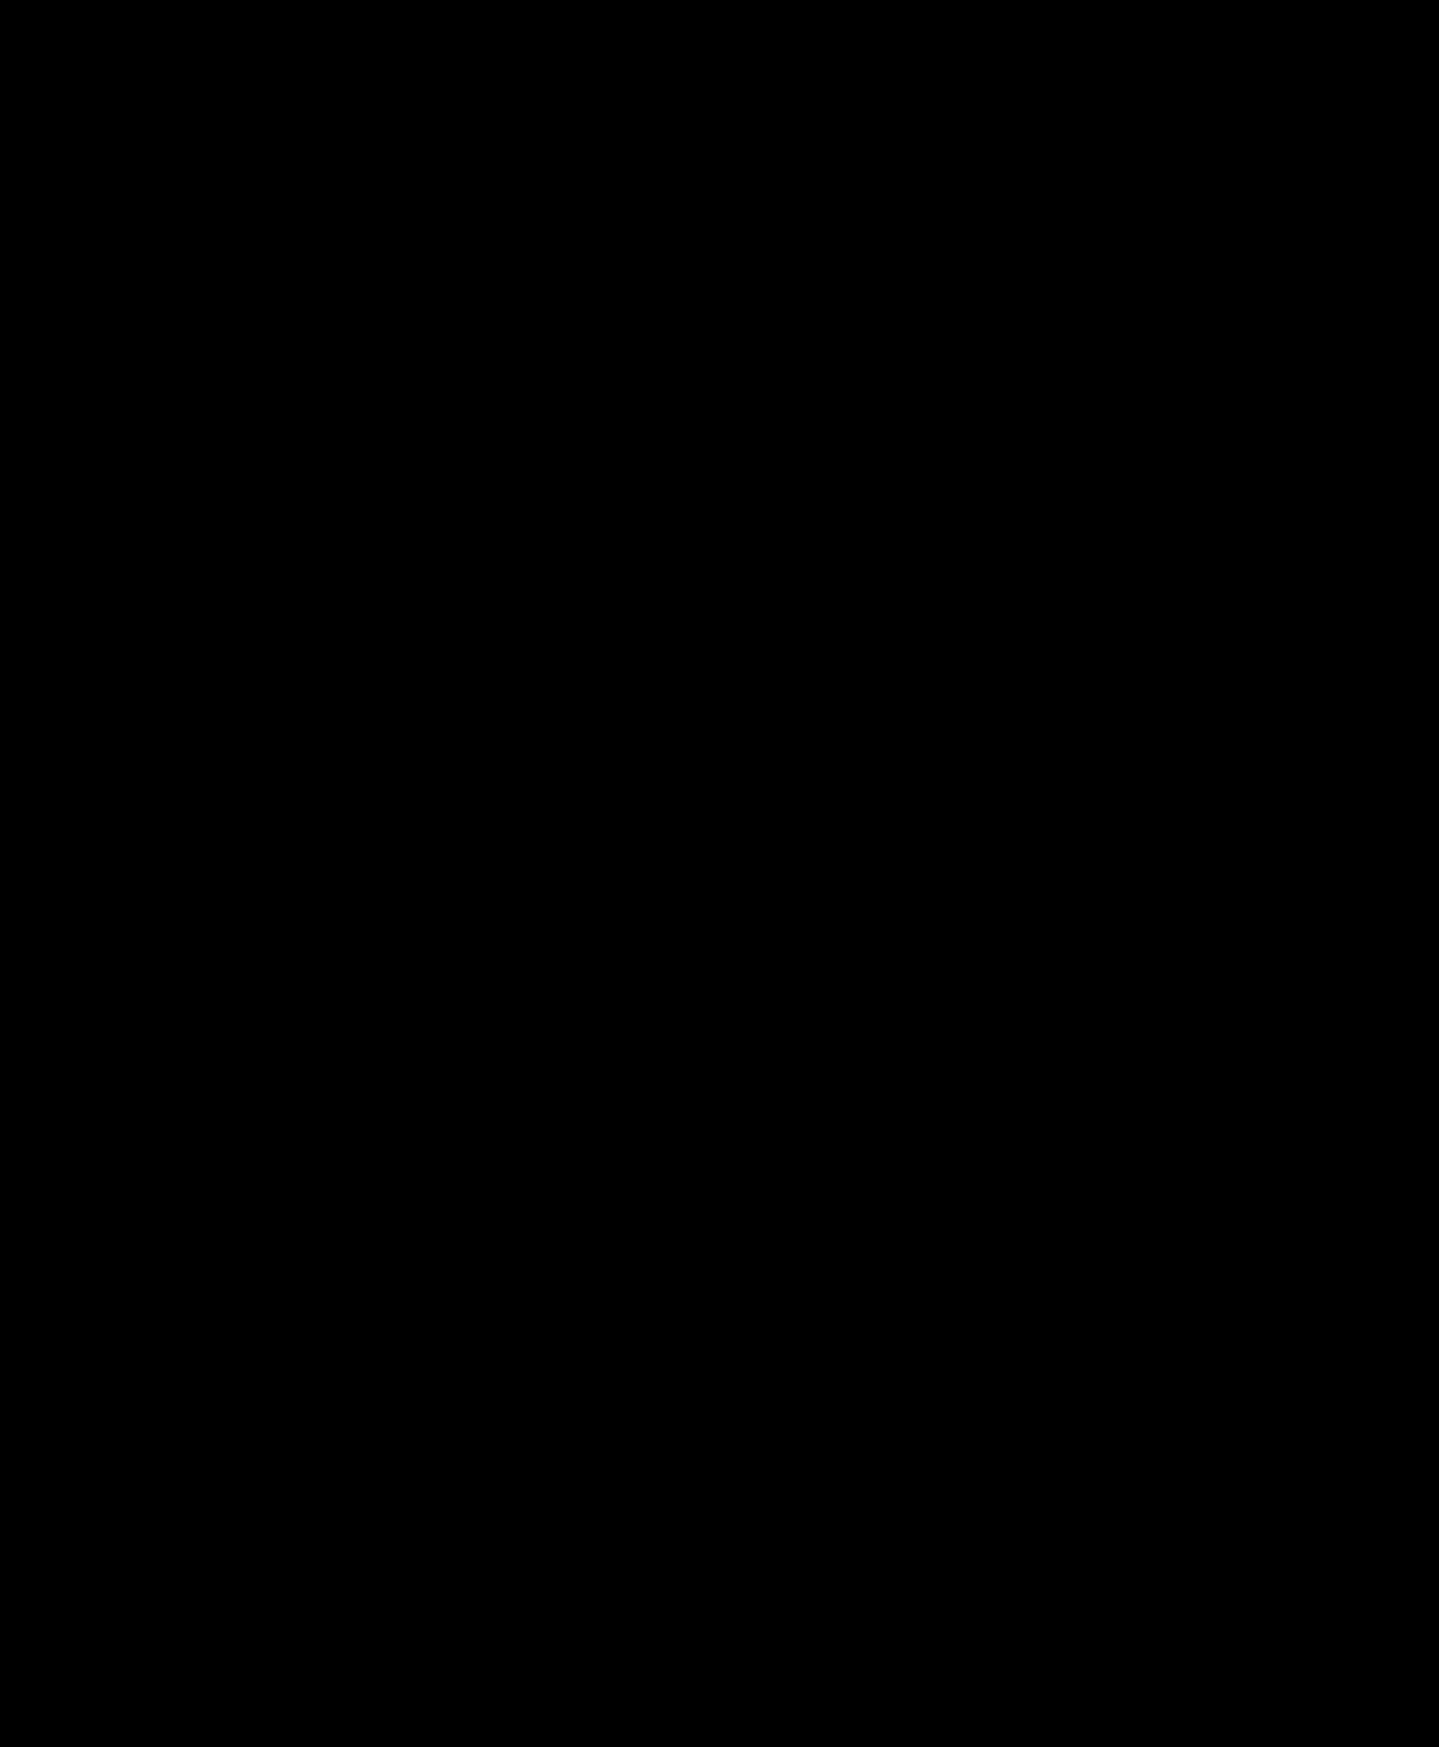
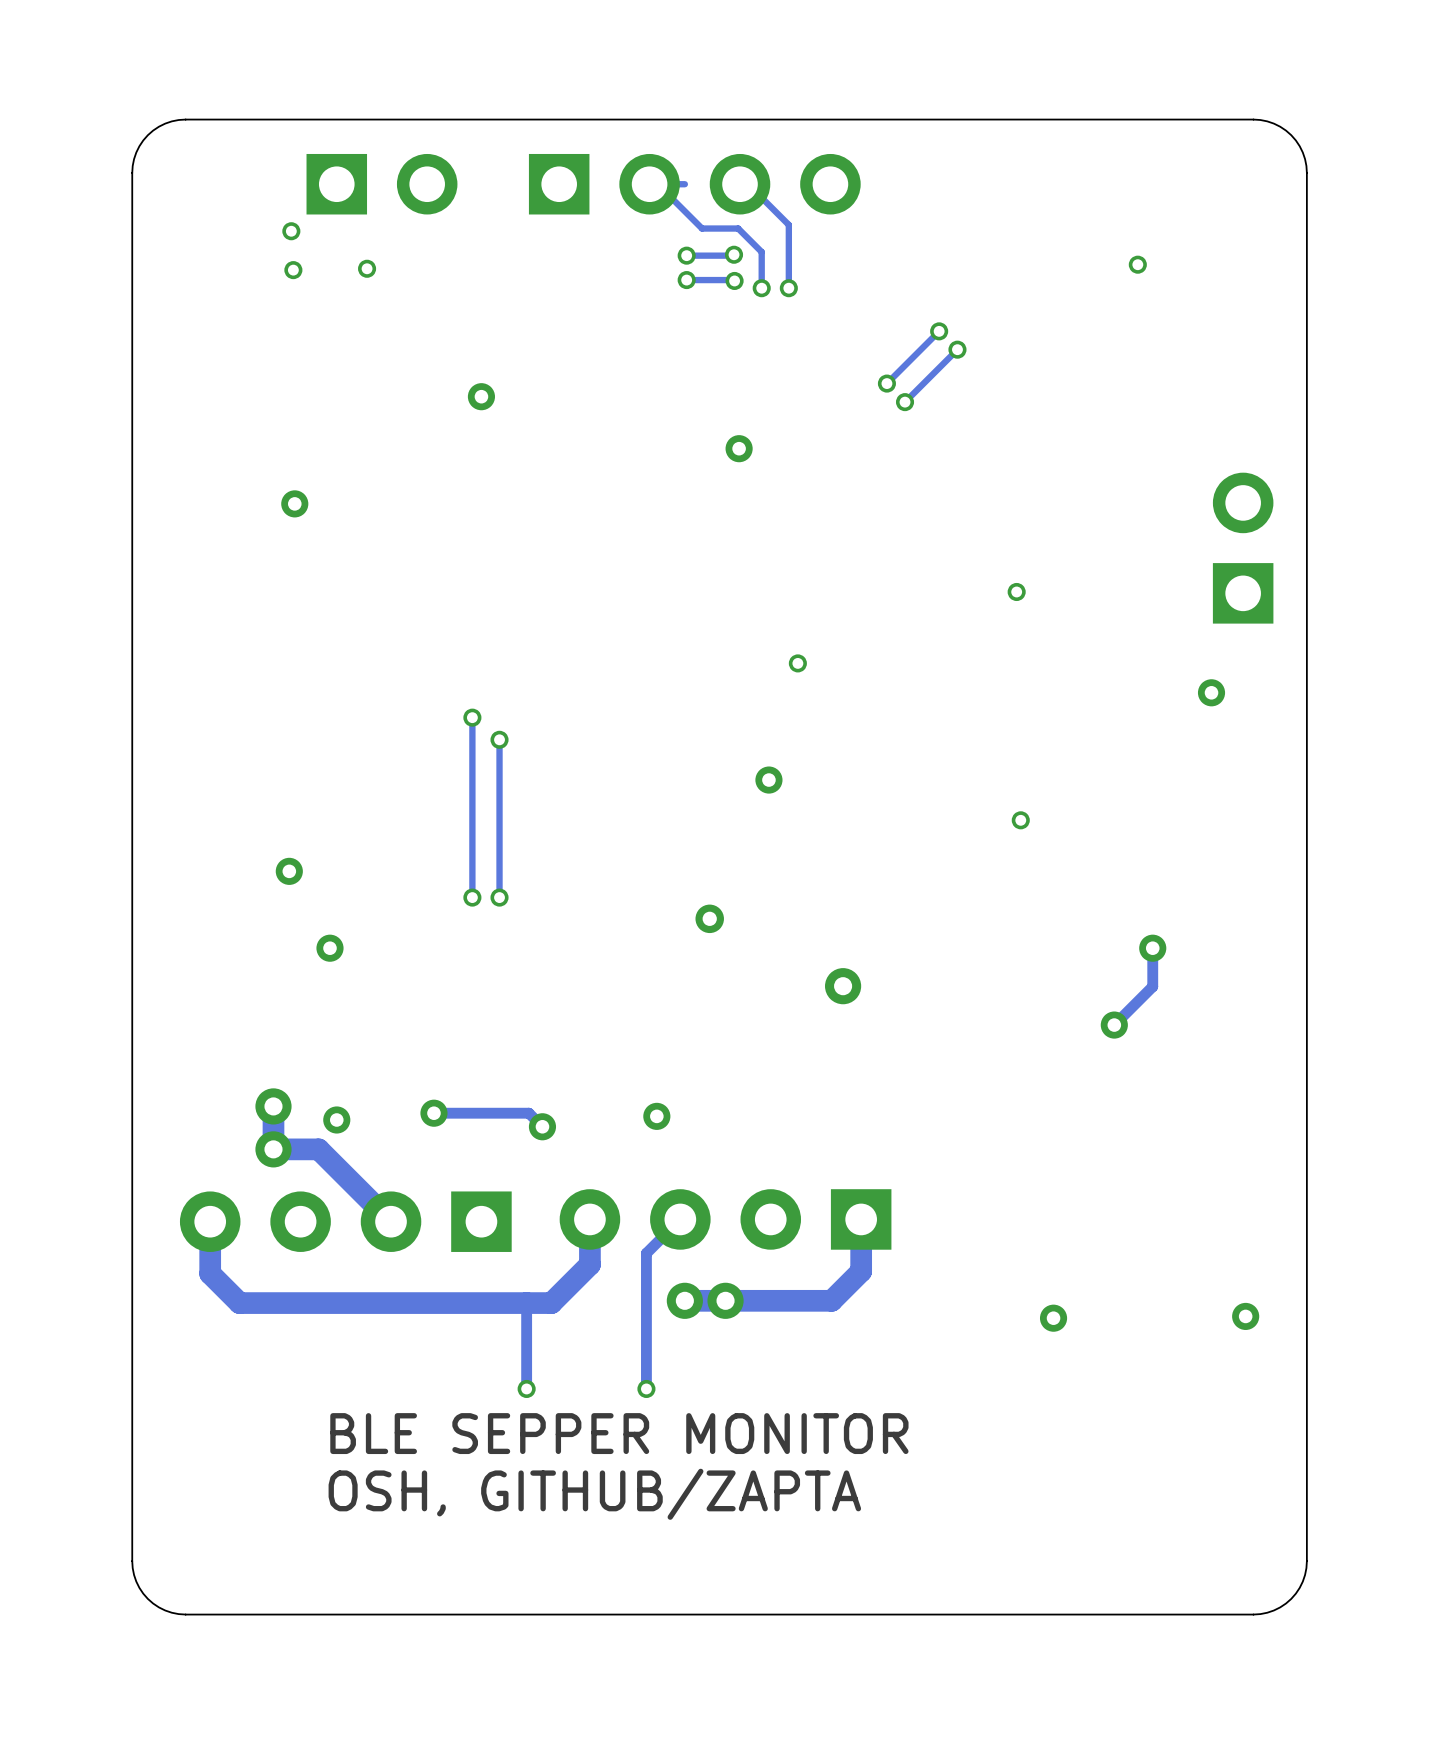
board edge: none -> (1253, 119) (185, 119) (165, 123) (153, 130) (143, 140) (134, 159) (132, 172) (132, 1561) (136, 1581) (143, 1593) (153, 1603) (165, 1610) (185, 1614) (1253, 1614) (1273, 1610) (1286, 1603) (1295, 1593) (1302, 1581) (1306, 1561) (1306, 172) (1302, 152) (1291, 135) (1273, 123) (1253, 119)
part: none -> (381, 184)
track: none -> (684, 184) (657, 184) (702, 228) (738, 228) (761, 252) (761, 288)
part: none -> (694, 184)
track: none -> (748, 184) (788, 224) (788, 288)
via: none -> (291, 231)
track: none -> (734, 254) (686, 255)
via: none -> (734, 254)
via: none -> (686, 255)
via: none -> (1137, 264)
via: none -> (367, 268)
via: none -> (293, 270)
track: none -> (686, 280) (734, 280)
via: none -> (686, 280)
via: none -> (734, 280)
via: none -> (761, 288)
via: none -> (788, 288)
track: none -> (939, 331) (886, 383)
via: none -> (939, 331)
track: none -> (957, 349) (905, 402)
via: none -> (957, 349)
via: none -> (886, 383)
via: none -> (481, 396)
via: none -> (905, 402)
via: none -> (739, 448)
via: none -> (294, 503)
part: none -> (1243, 548)
via: none -> (1016, 591)
via: none -> (797, 663)
via: none -> (1211, 692)
track: none -> (472, 717) (472, 897)
via: none -> (472, 717)
track: none -> (499, 739) (499, 897)
via: none -> (499, 739)
via: none -> (768, 780)
via: none -> (1020, 820)
via: none -> (289, 871)
via: none -> (472, 897)
via: none -> (499, 897)
via: none -> (709, 918)
via: none -> (329, 948)
track: none -> (1152, 948) (1152, 986) (1114, 1025)
via: none -> (1152, 948)
via: none -> (843, 986)
via: none -> (1114, 1025)
track: none -> (273, 1106) (273, 1149) (318, 1149) (391, 1221)
via: none -> (273, 1106)
track: none -> (433, 1113) (528, 1113) (542, 1126)
via: none -> (433, 1113)
via: none -> (656, 1116)
via: none -> (336, 1119)
via: none -> (542, 1126)
via: none -> (273, 1149)
track: none -> (589, 1219) (589, 1264) (551, 1303) (239, 1303) (210, 1273) (210, 1221)
track: none -> (680, 1219) (646, 1253) (646, 1388)
part: none -> (725, 1219)
track: none -> (861, 1219) (861, 1271) (831, 1300) (684, 1300)
part: none -> (345, 1221)
via: none -> (684, 1300)
via: none -> (725, 1300)
track: none -> (526, 1303) (526, 1388)
via: none -> (1245, 1316)
via: none -> (1053, 1318)
via: none -> (526, 1388)
via: none -> (646, 1388)
text: none -> BLE SEPPER MONITOR (619, 1433)
text: none -> OSH, GITHUB/ZAPTA (594, 1494)

